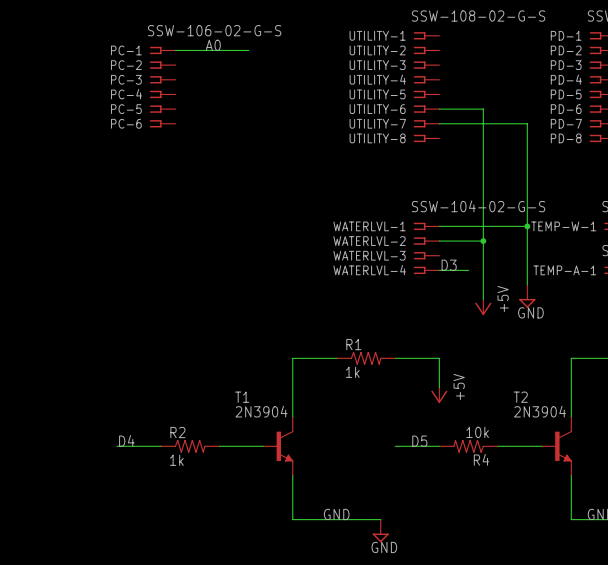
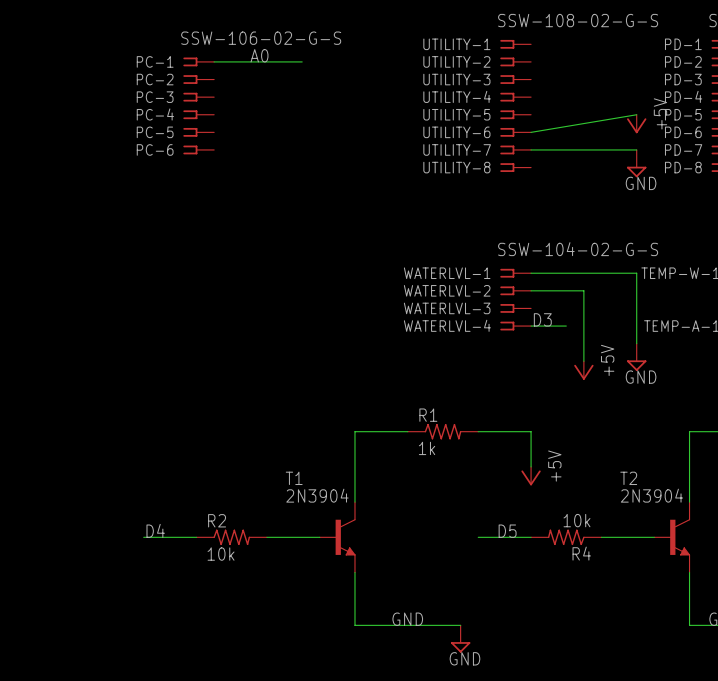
power symbol: none -> +5V (636, 124)
wire: (439, 109) (483, 109) (483, 241) -> (531, 132) (636, 114)
wire: (527, 123) (527, 226) -> none
power symbol: none -> GND (636, 163)
junction: (527, 226) -> none
junction: (483, 241) -> none
R2 value: 1k (176, 460) -> 10k (221, 554)

